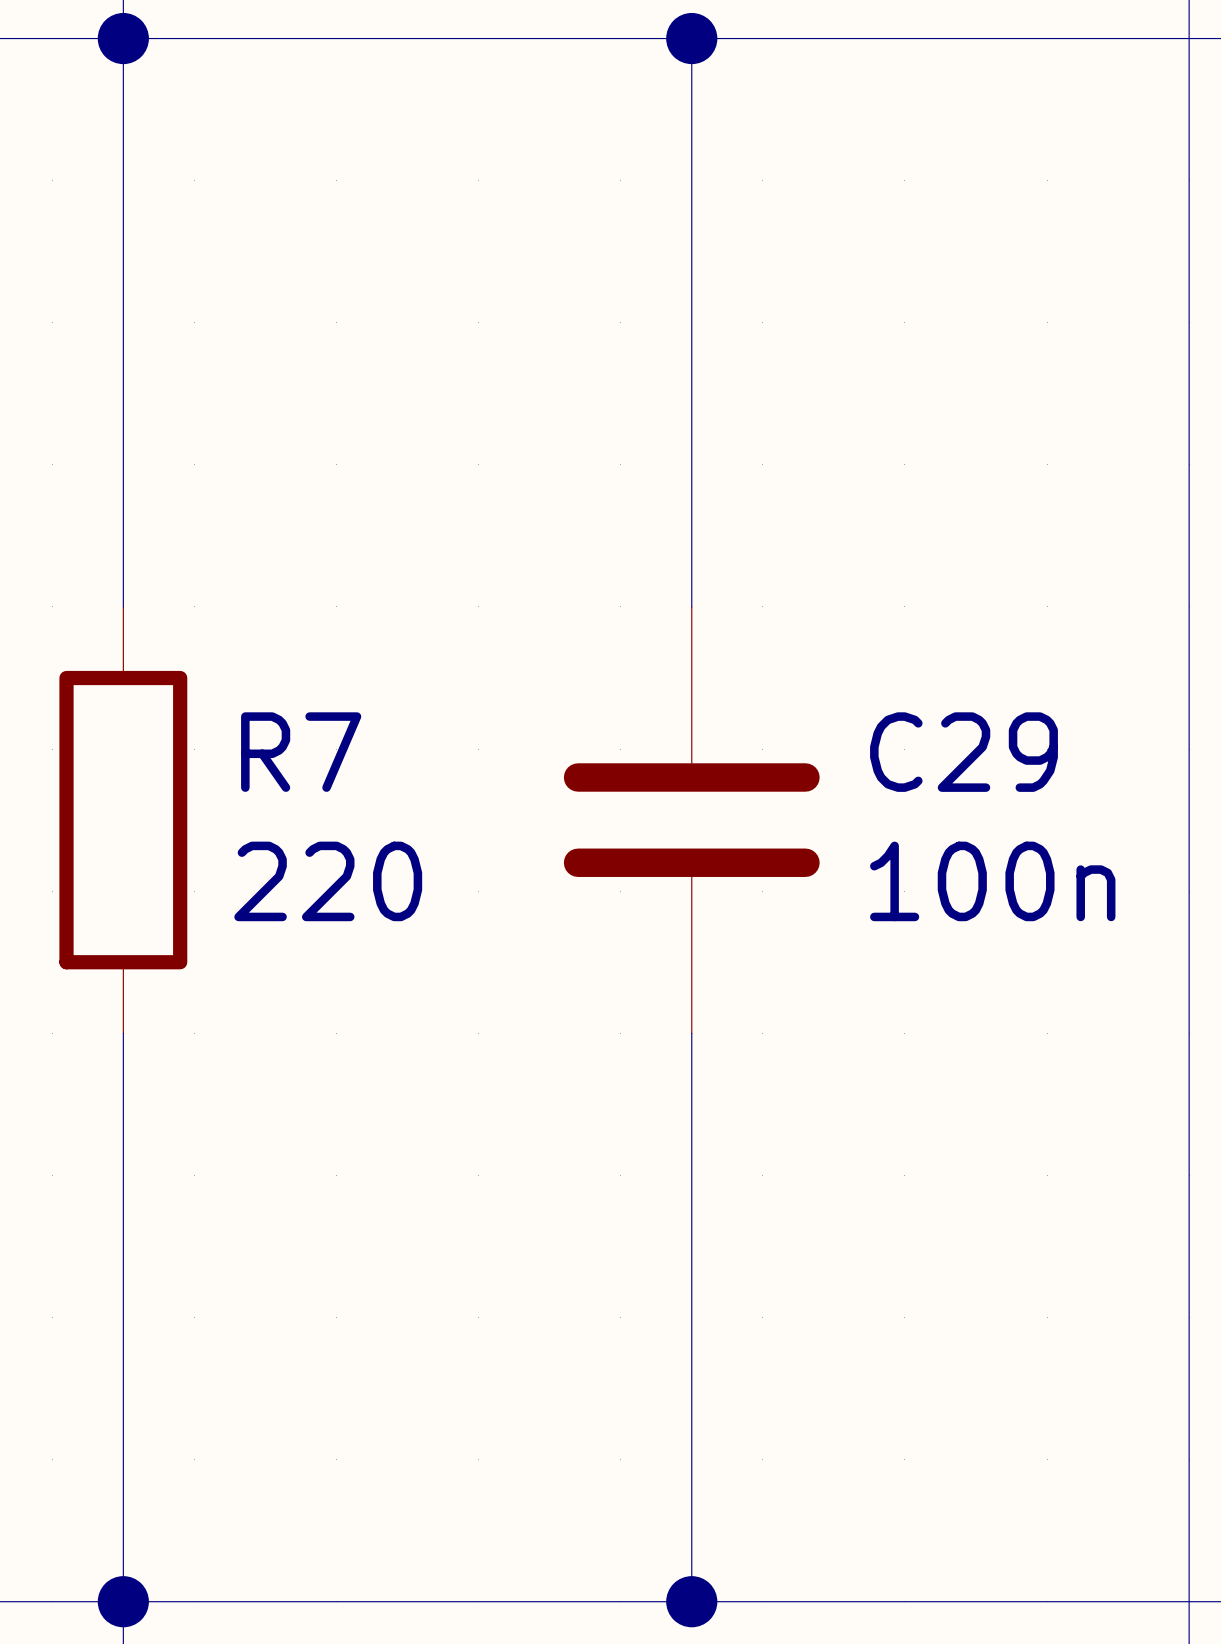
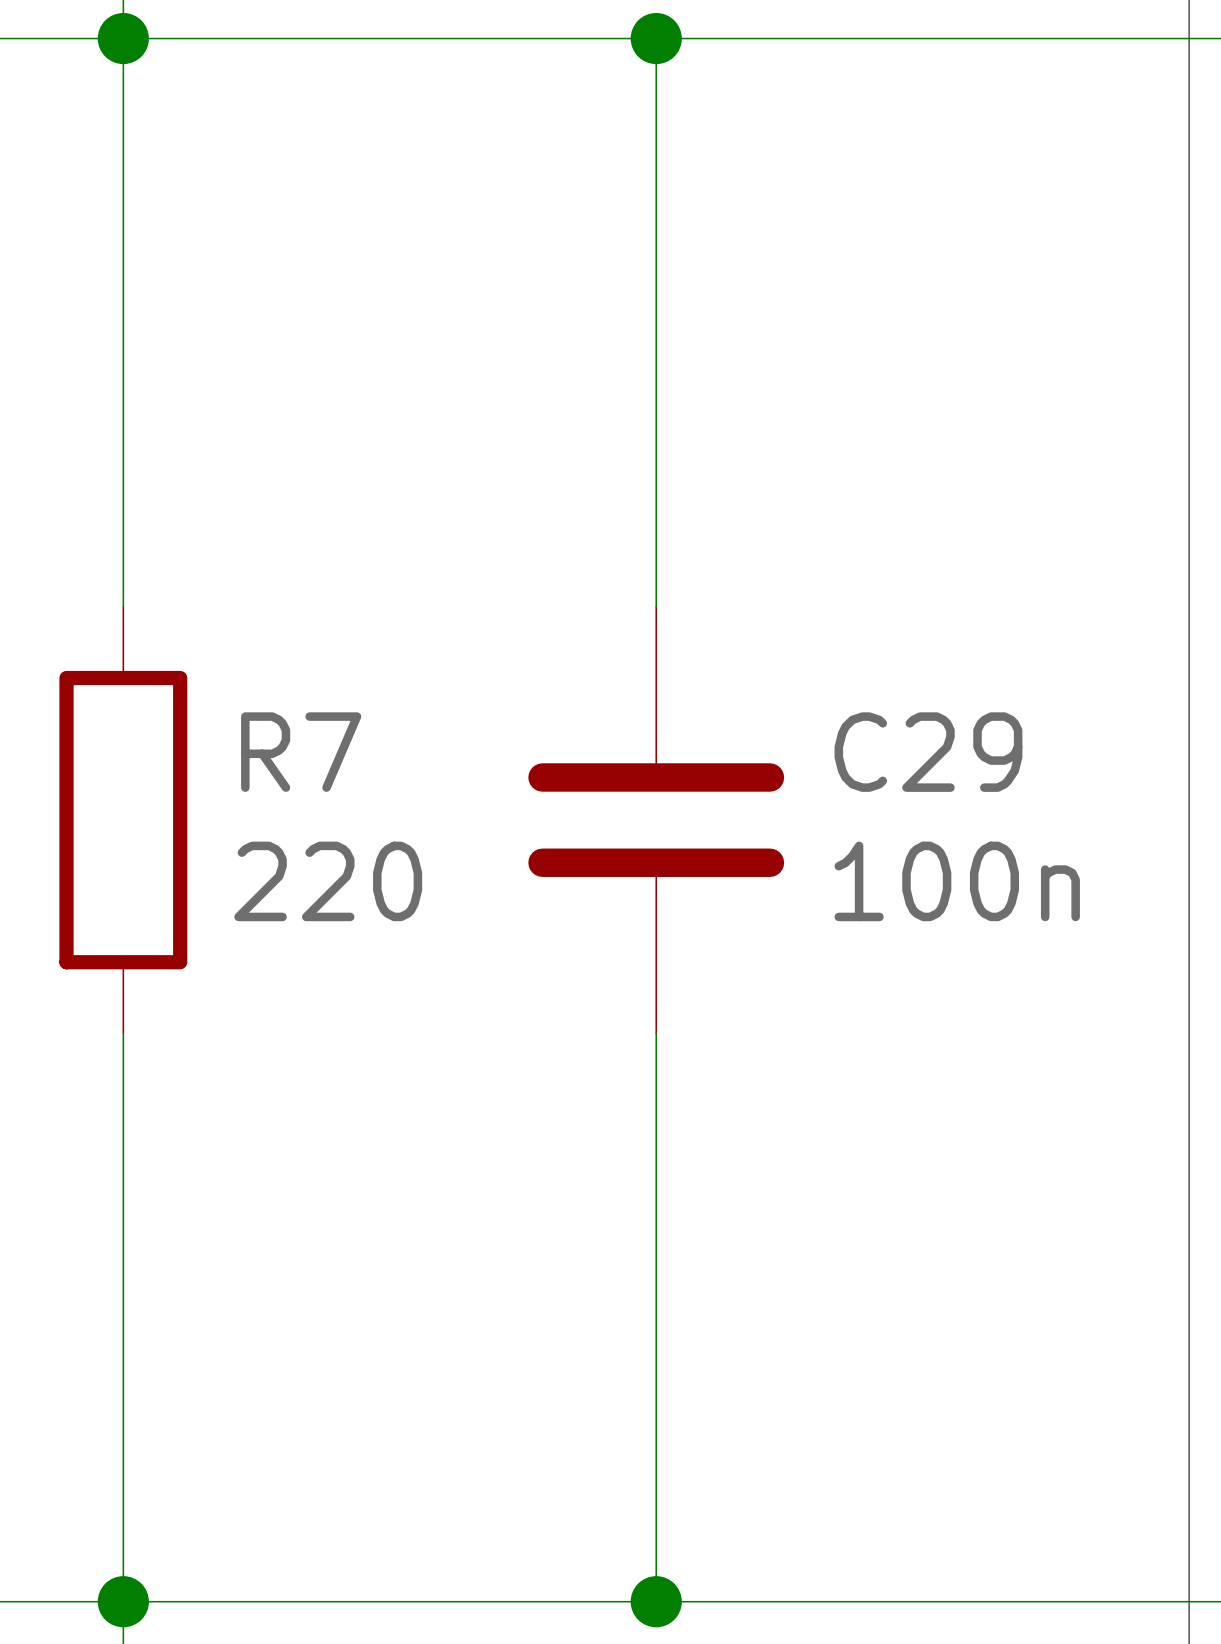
wire: (691, 38) (691, 606) -> (656, 38) (656, 606)
junction position: (691, 38) -> (656, 38)
C29 position: (691, 820) -> (656, 820)
wire: (691, 1033) (691, 1601) -> (656, 1033) (656, 1601)
junction position: (691, 1601) -> (656, 1601)

